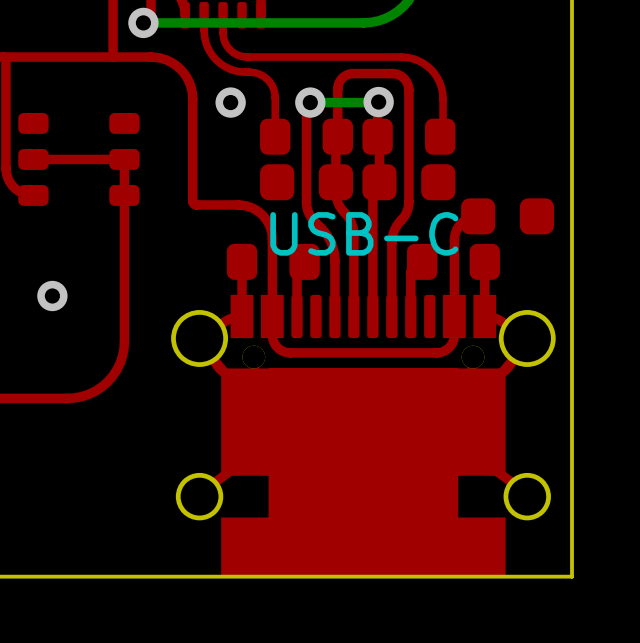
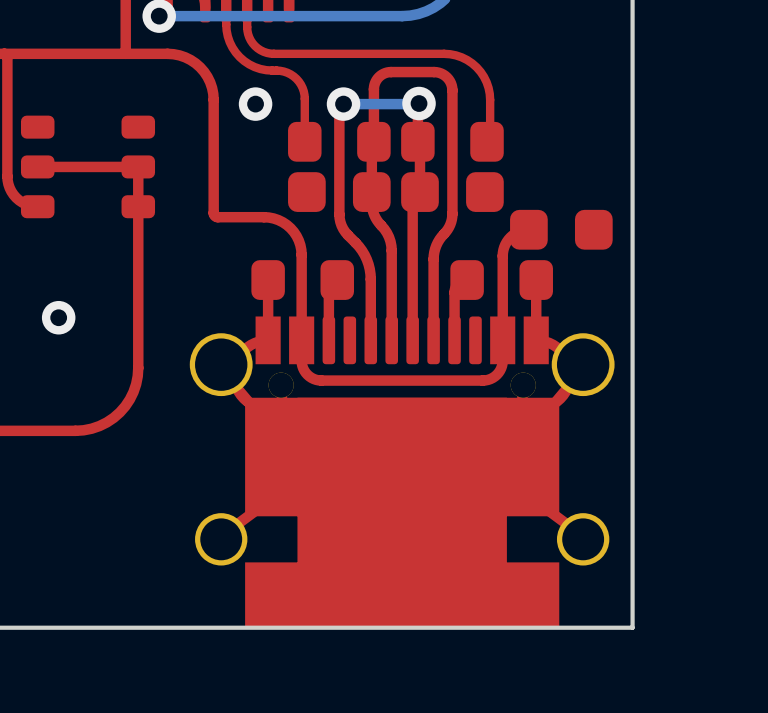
text: USB-C (364, 233) -> none

